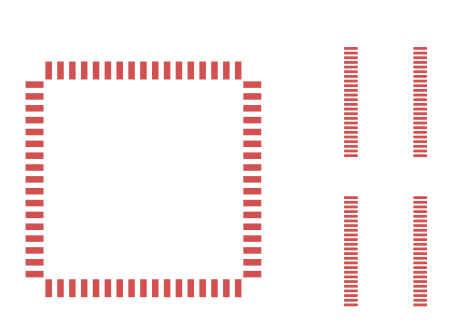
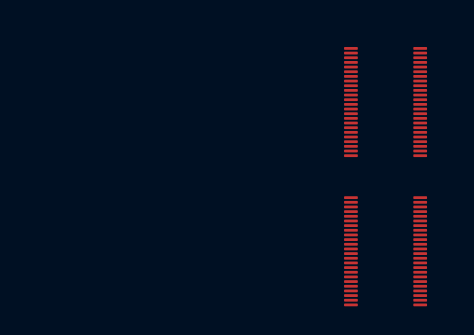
part: (143, 179) -> none

